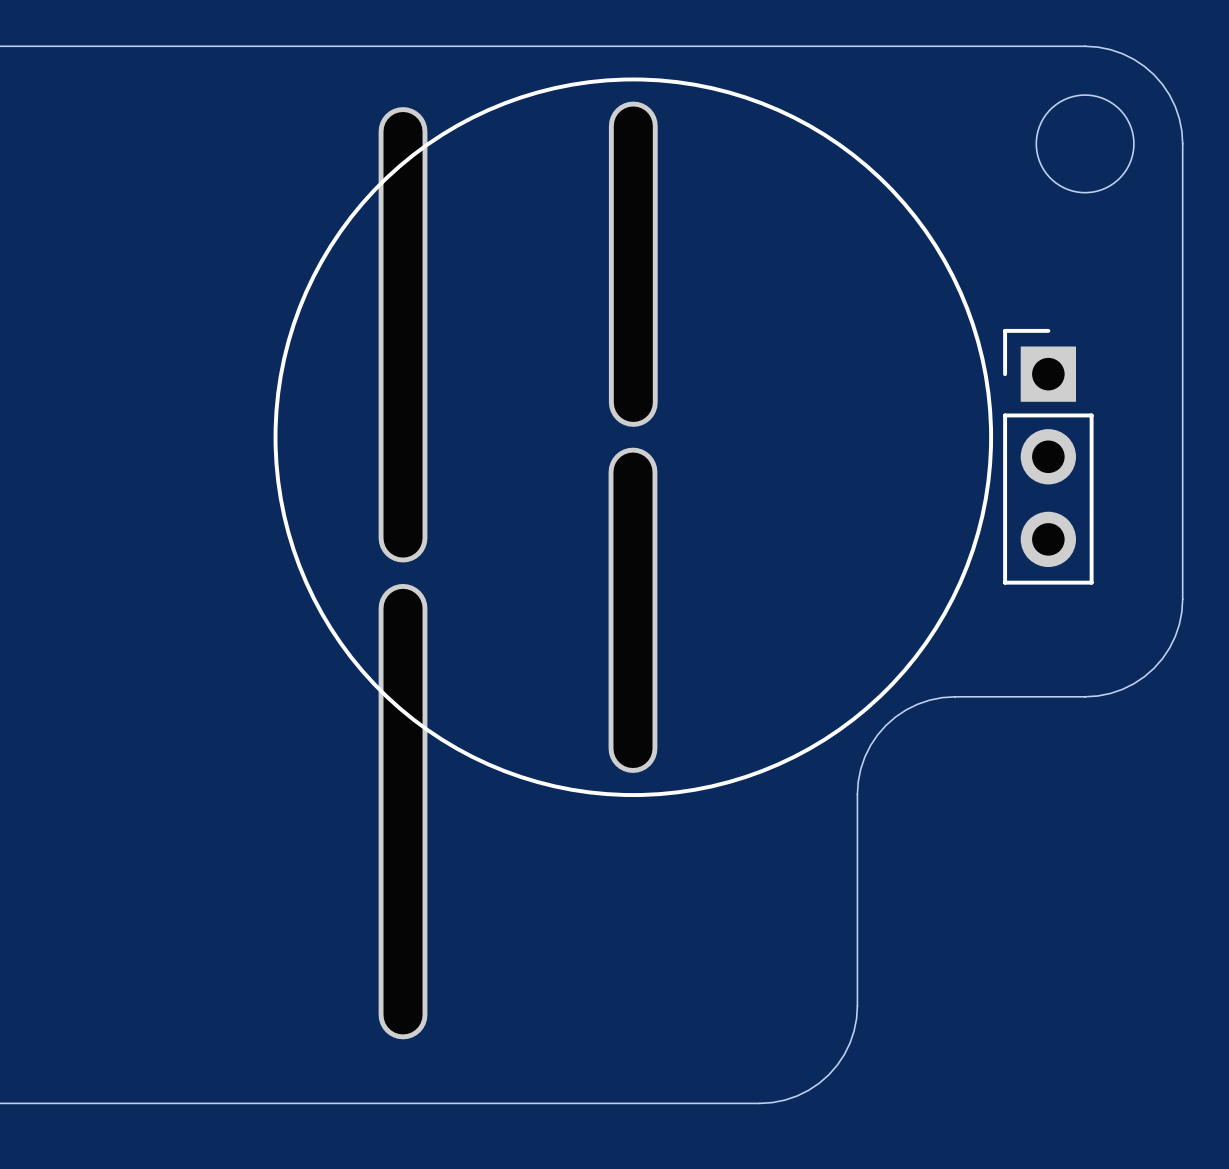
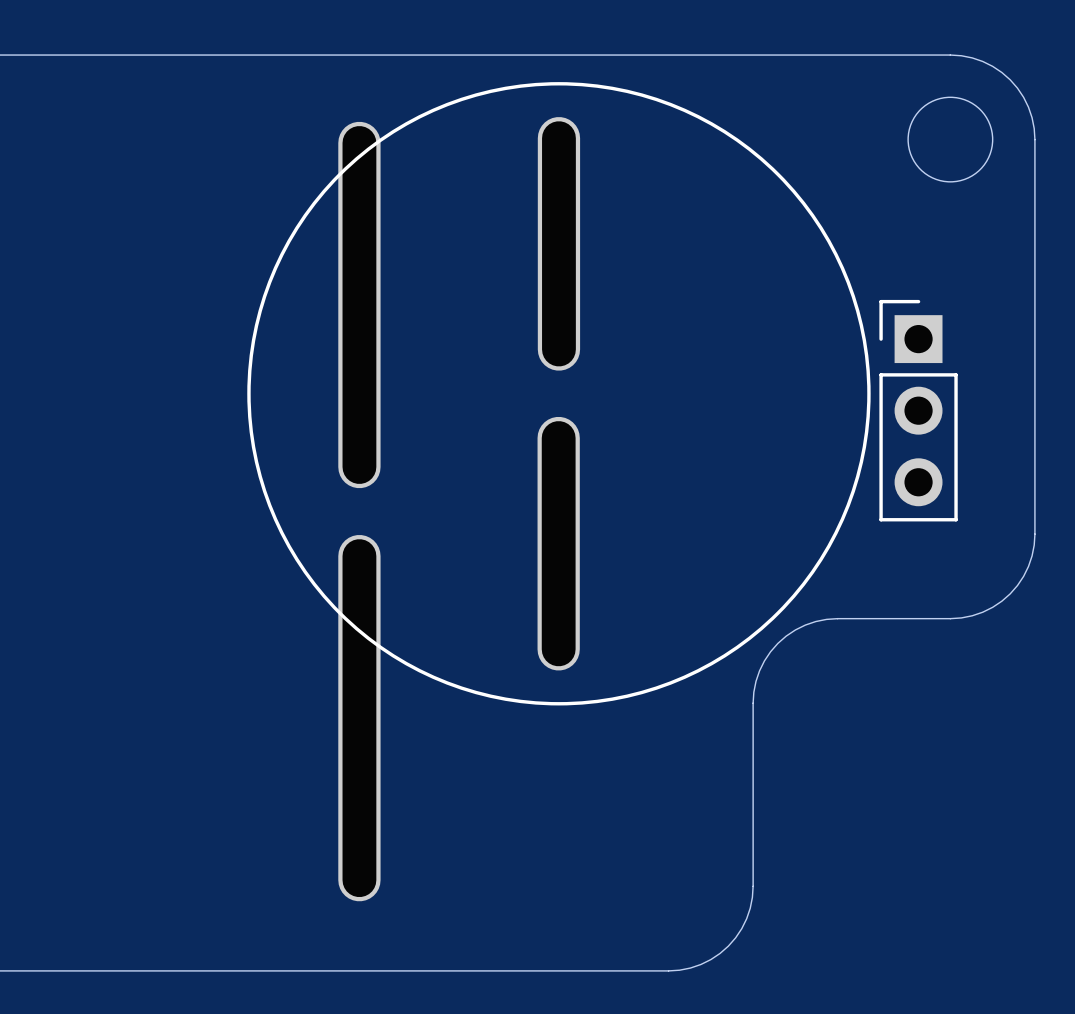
part footprint: [273, 77, 994, 798] -> [247, 82, 871, 706]
part footprint: [378, 107, 428, 1040] -> [338, 121, 381, 902]

